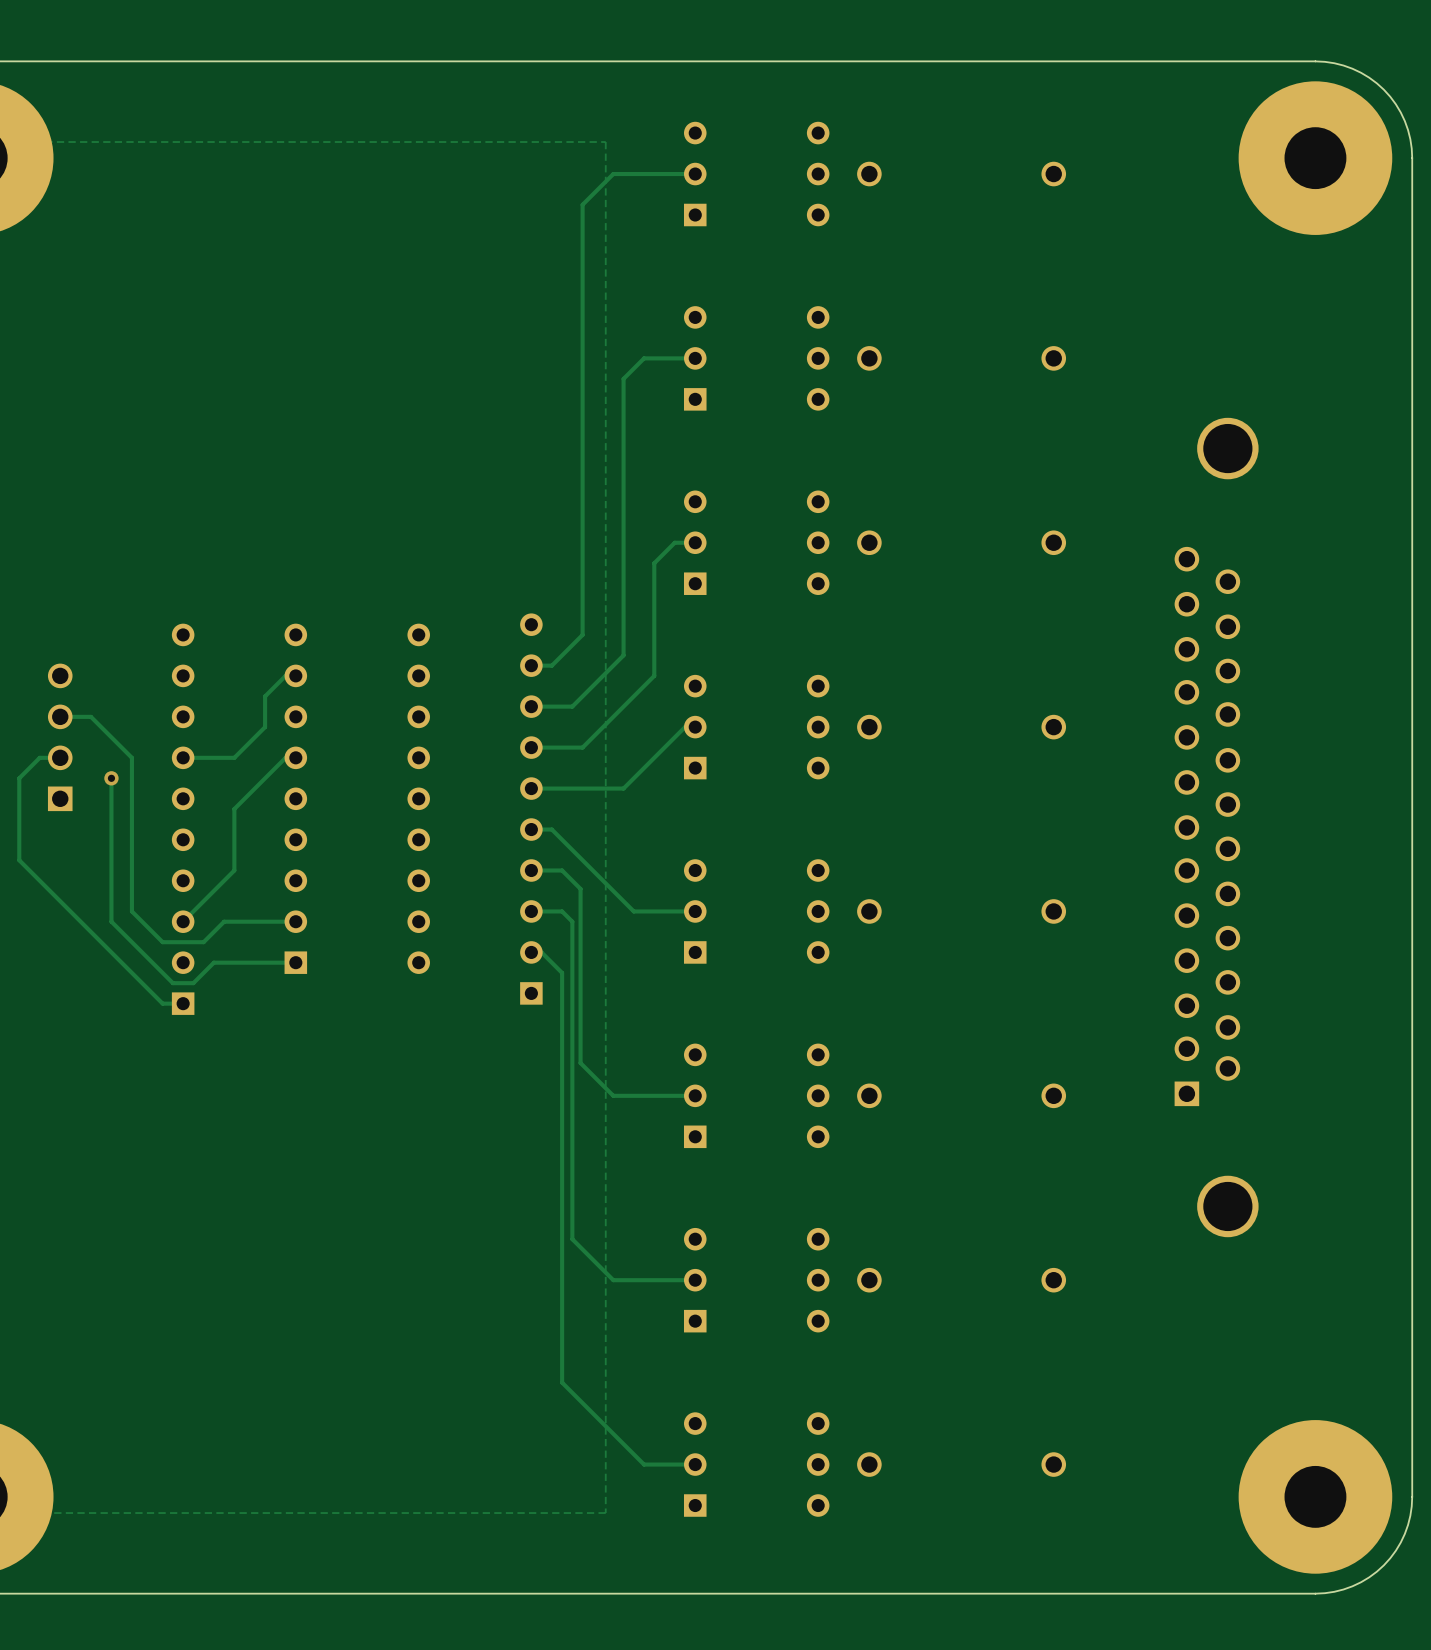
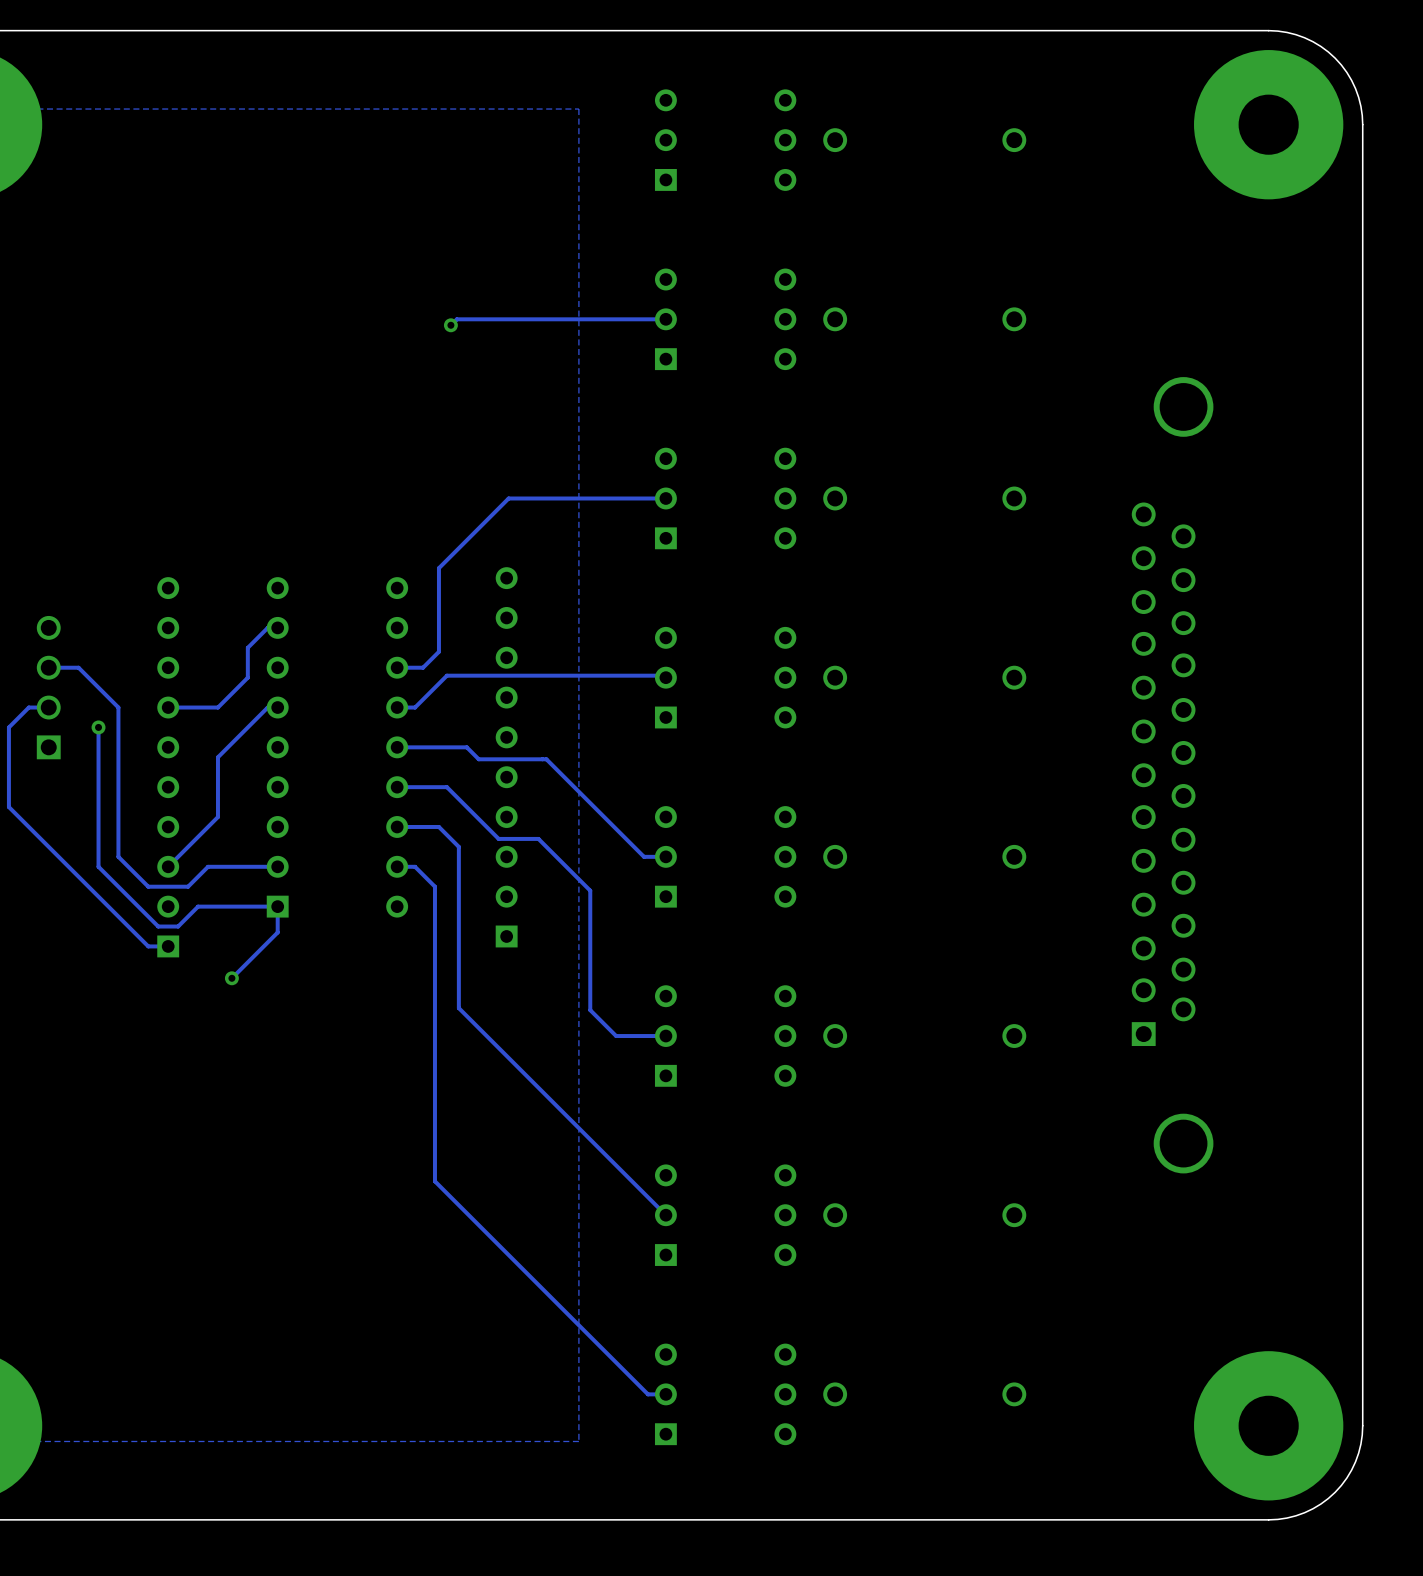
track: (695, 174) (613, 174) (582, 204) (582, 634) (551, 665) (531, 665) -> none
track: (644, 358) (623, 378) (623, 655) (572, 706) (531, 706) -> (616, 319) (456, 319) (450, 325)
via: none -> (450, 325)
track: (674, 542) (654, 563) (654, 675) (582, 747) (531, 747) -> (646, 498) (508, 498) (438, 568) (438, 651) (423, 667) (397, 667)
track: (695, 727) (685, 727) (623, 788) (531, 788) -> (665, 677) (663, 675) (446, 675) (415, 707) (397, 707)
track: (531, 829) (551, 829) (633, 911) (672, 911) -> (397, 747) (466, 747) (478, 759) (546, 759) (644, 856)
track: (531, 870) (562, 870) (580, 888) (580, 1063) (613, 1095) (644, 1095) -> (397, 787) (446, 787) (498, 838) (538, 838) (590, 890) (590, 1010) (616, 1036)
track: (531, 911) (562, 911) (572, 921) (572, 1239) (613, 1280) (695, 1280) -> (397, 826) (438, 826) (458, 846) (458, 1008) (665, 1215)
track: (531, 952) (541, 952) (562, 972) (562, 1382) (644, 1464) (676, 1464) -> (397, 866) (415, 866) (434, 886) (434, 1181) (648, 1394)
track: none -> (277, 906) (277, 932) (231, 978)
via: none -> (231, 978)

